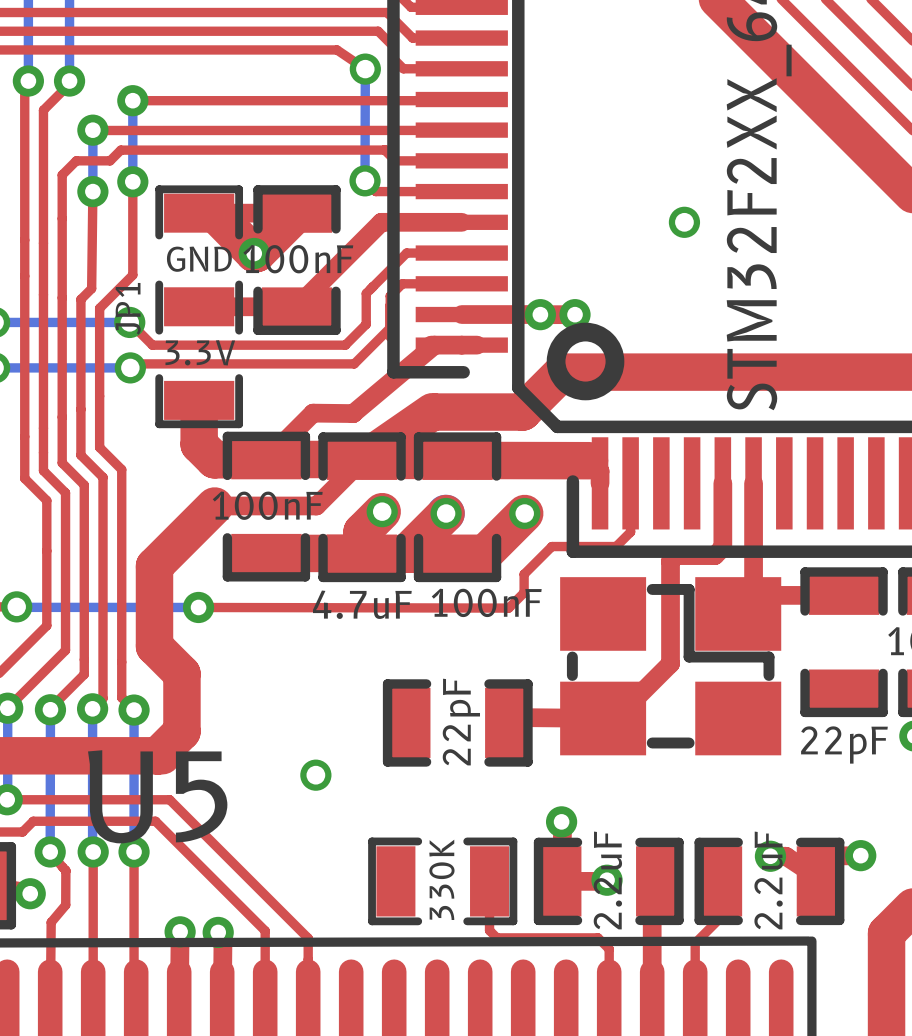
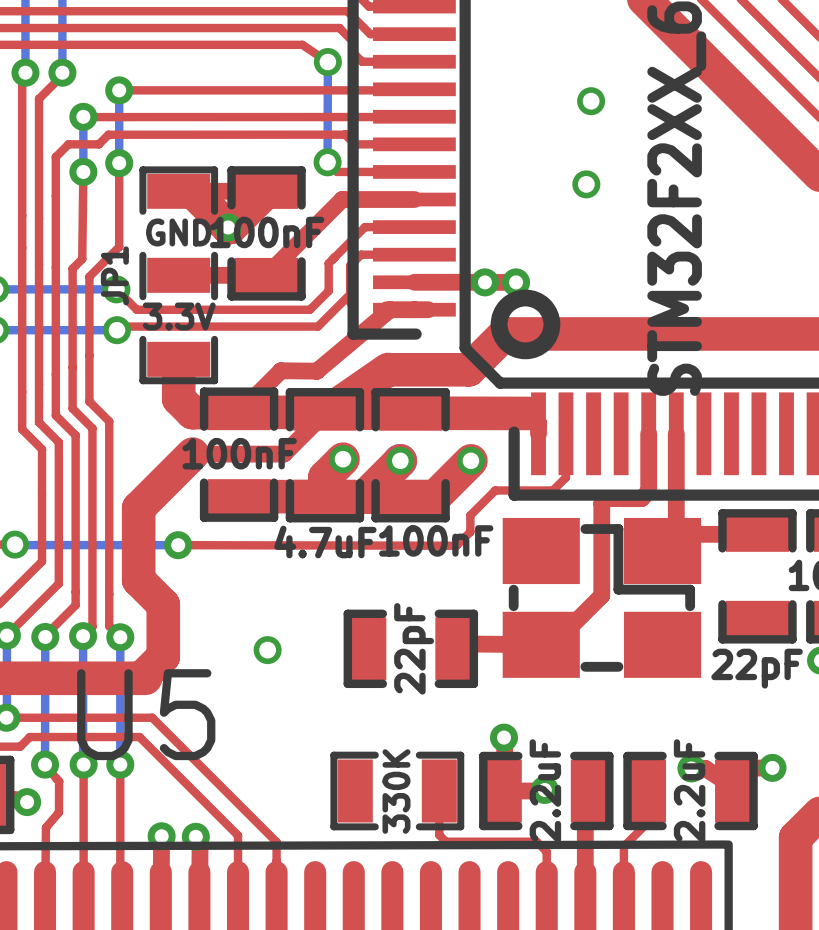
part: none -> (591, 101)
part position: (684, 222) -> (586, 184)
part position: (315, 775) -> (267, 650)

